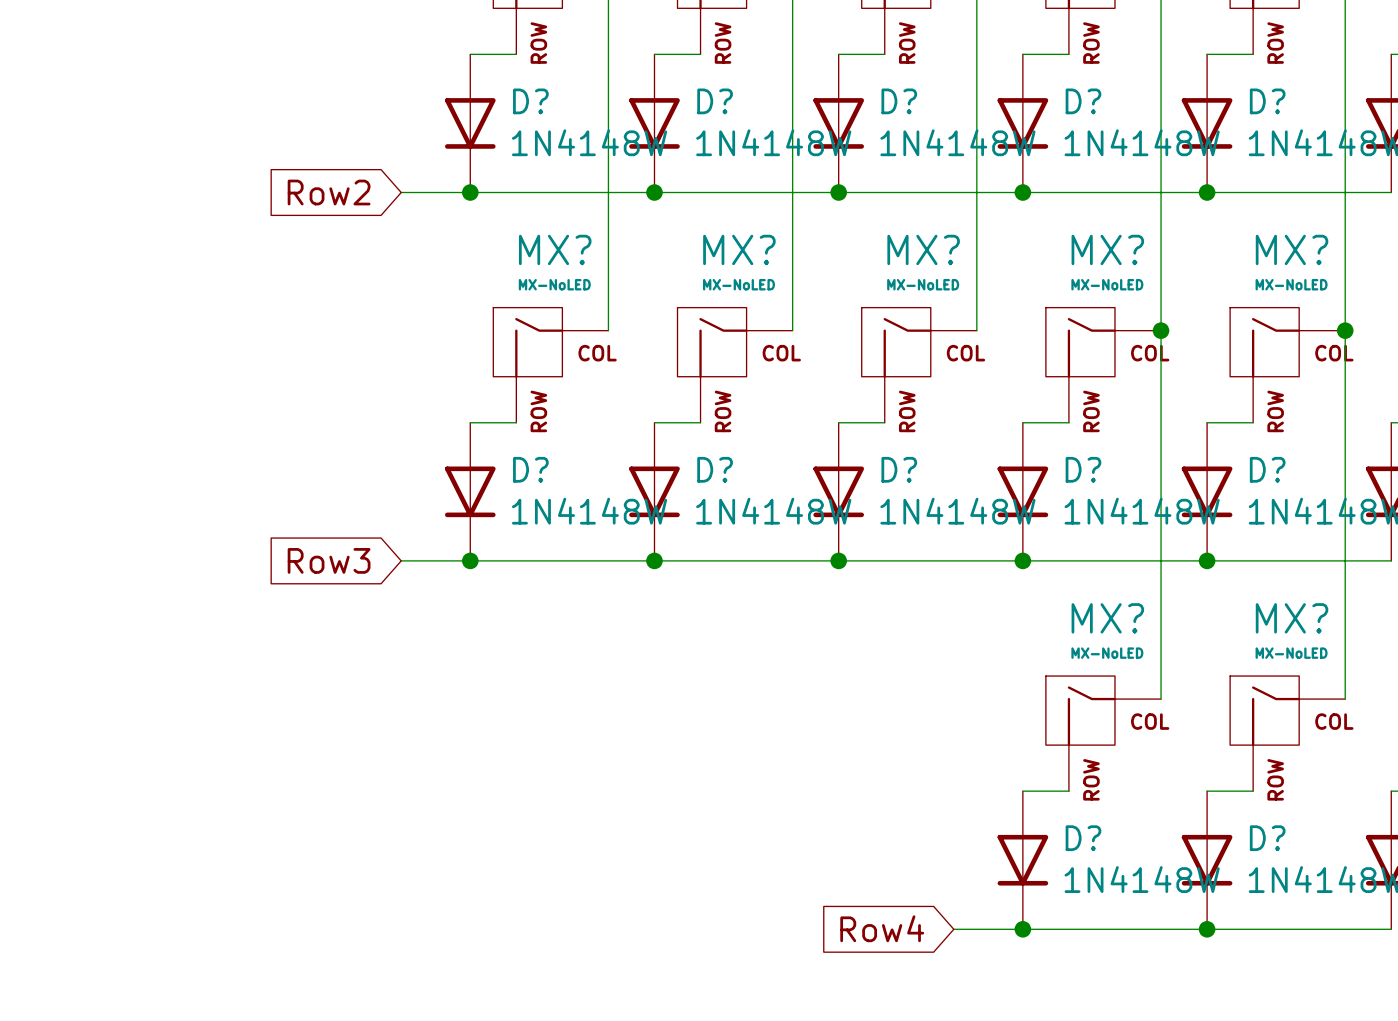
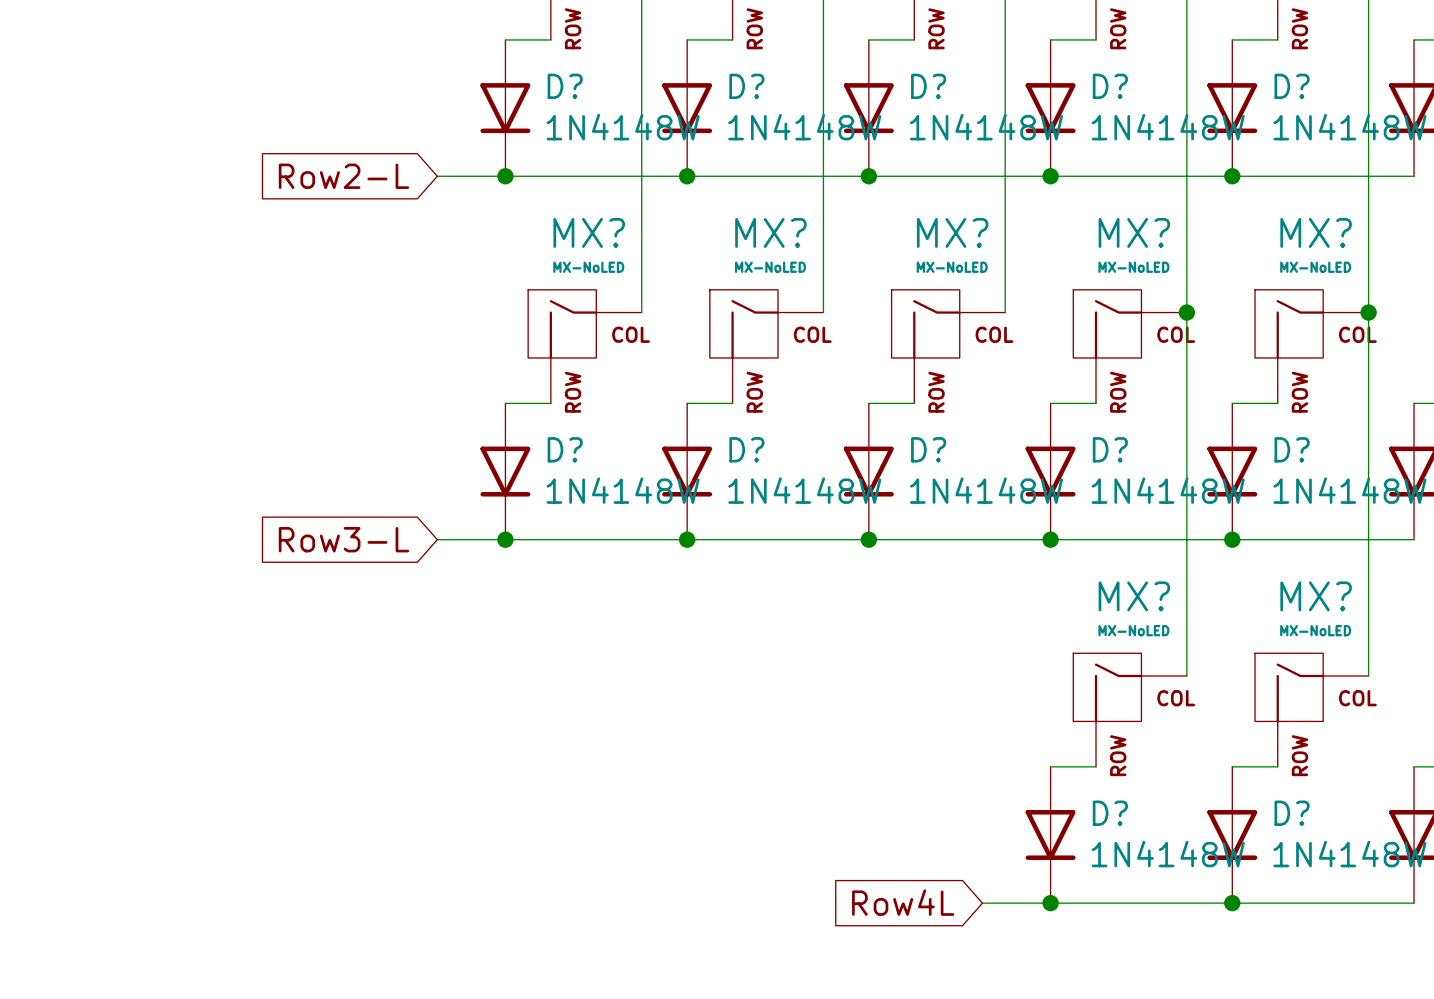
global label: Row2 (329, 192) -> Row2-L (343, 176)
global label: Row3 (329, 560) -> Row3-L (343, 539)
global label: Row4 (882, 928) -> Row4L (903, 902)

